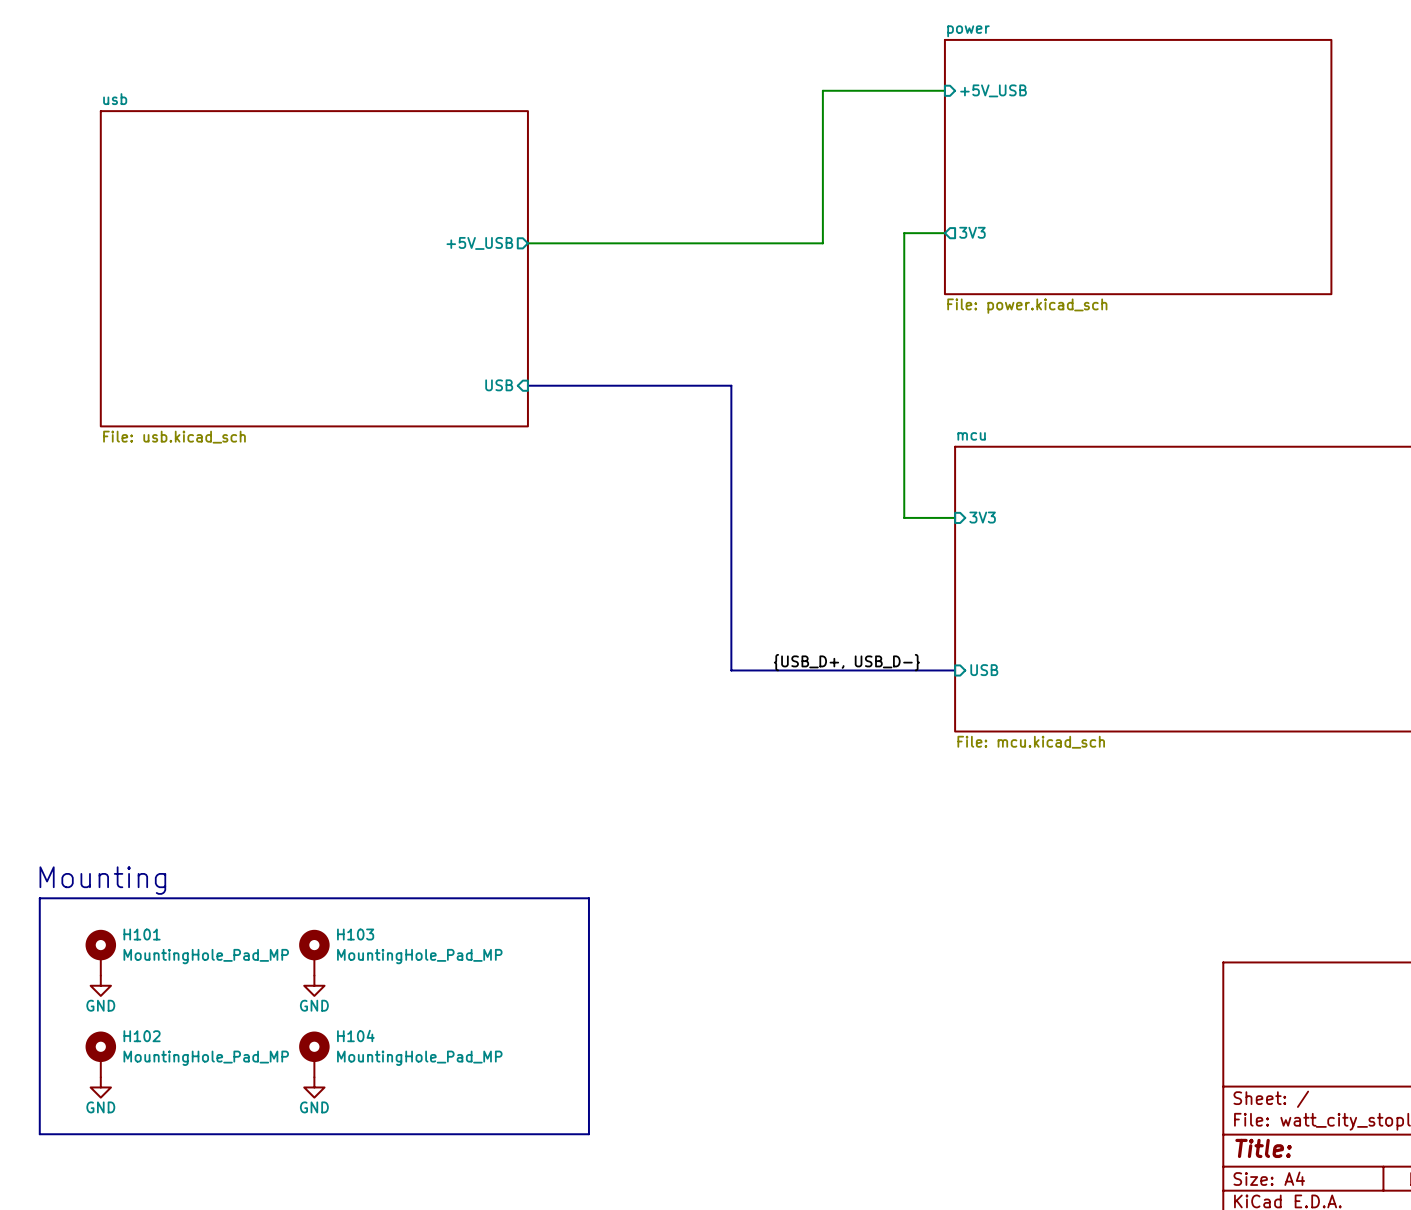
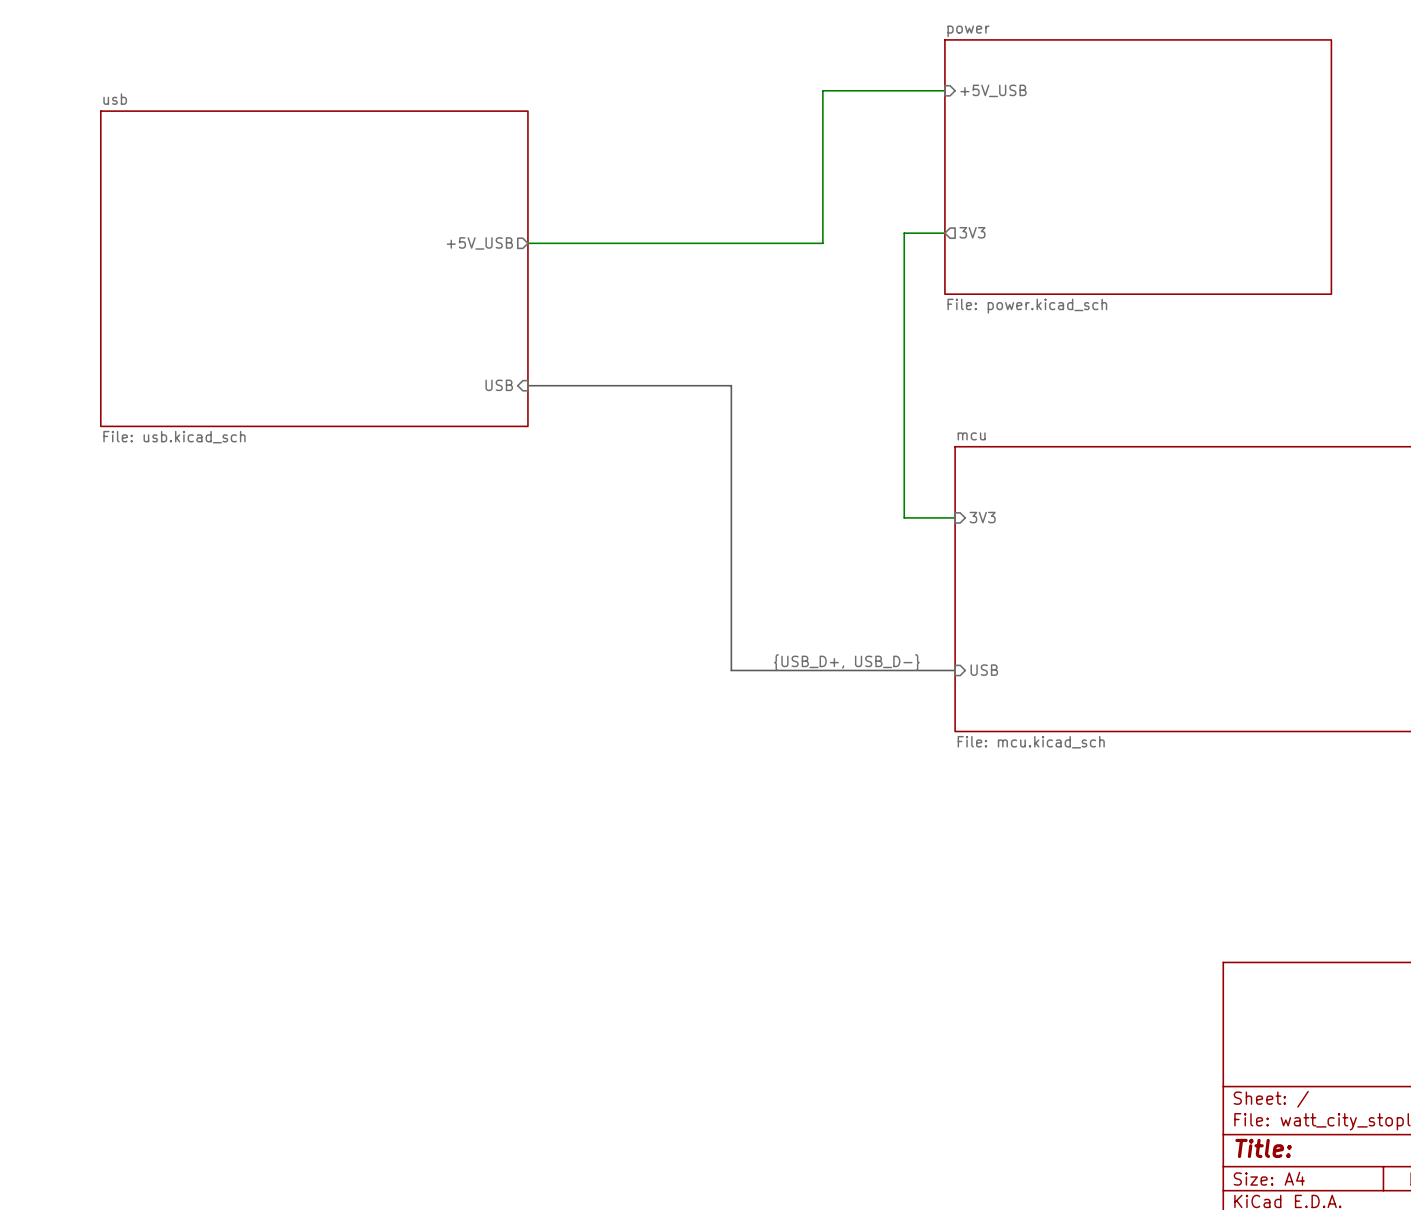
text: Mounting (102, 880) -> none
line: (39, 898) (588, 898) (588, 1134) (39, 1134) (39, 898) -> none
H101: MountingHole_Pad_MP (100, 952) -> none
H103: MountingHole_Pad_MP (314, 952) -> none
power symbol: GND (100, 985) -> none
power symbol: GND (314, 985) -> none
H102: MountingHole_Pad_MP (100, 1054) -> none
H104: MountingHole_Pad_MP (314, 1054) -> none
power symbol: GND (100, 1087) -> none
power symbol: GND (314, 1087) -> none

